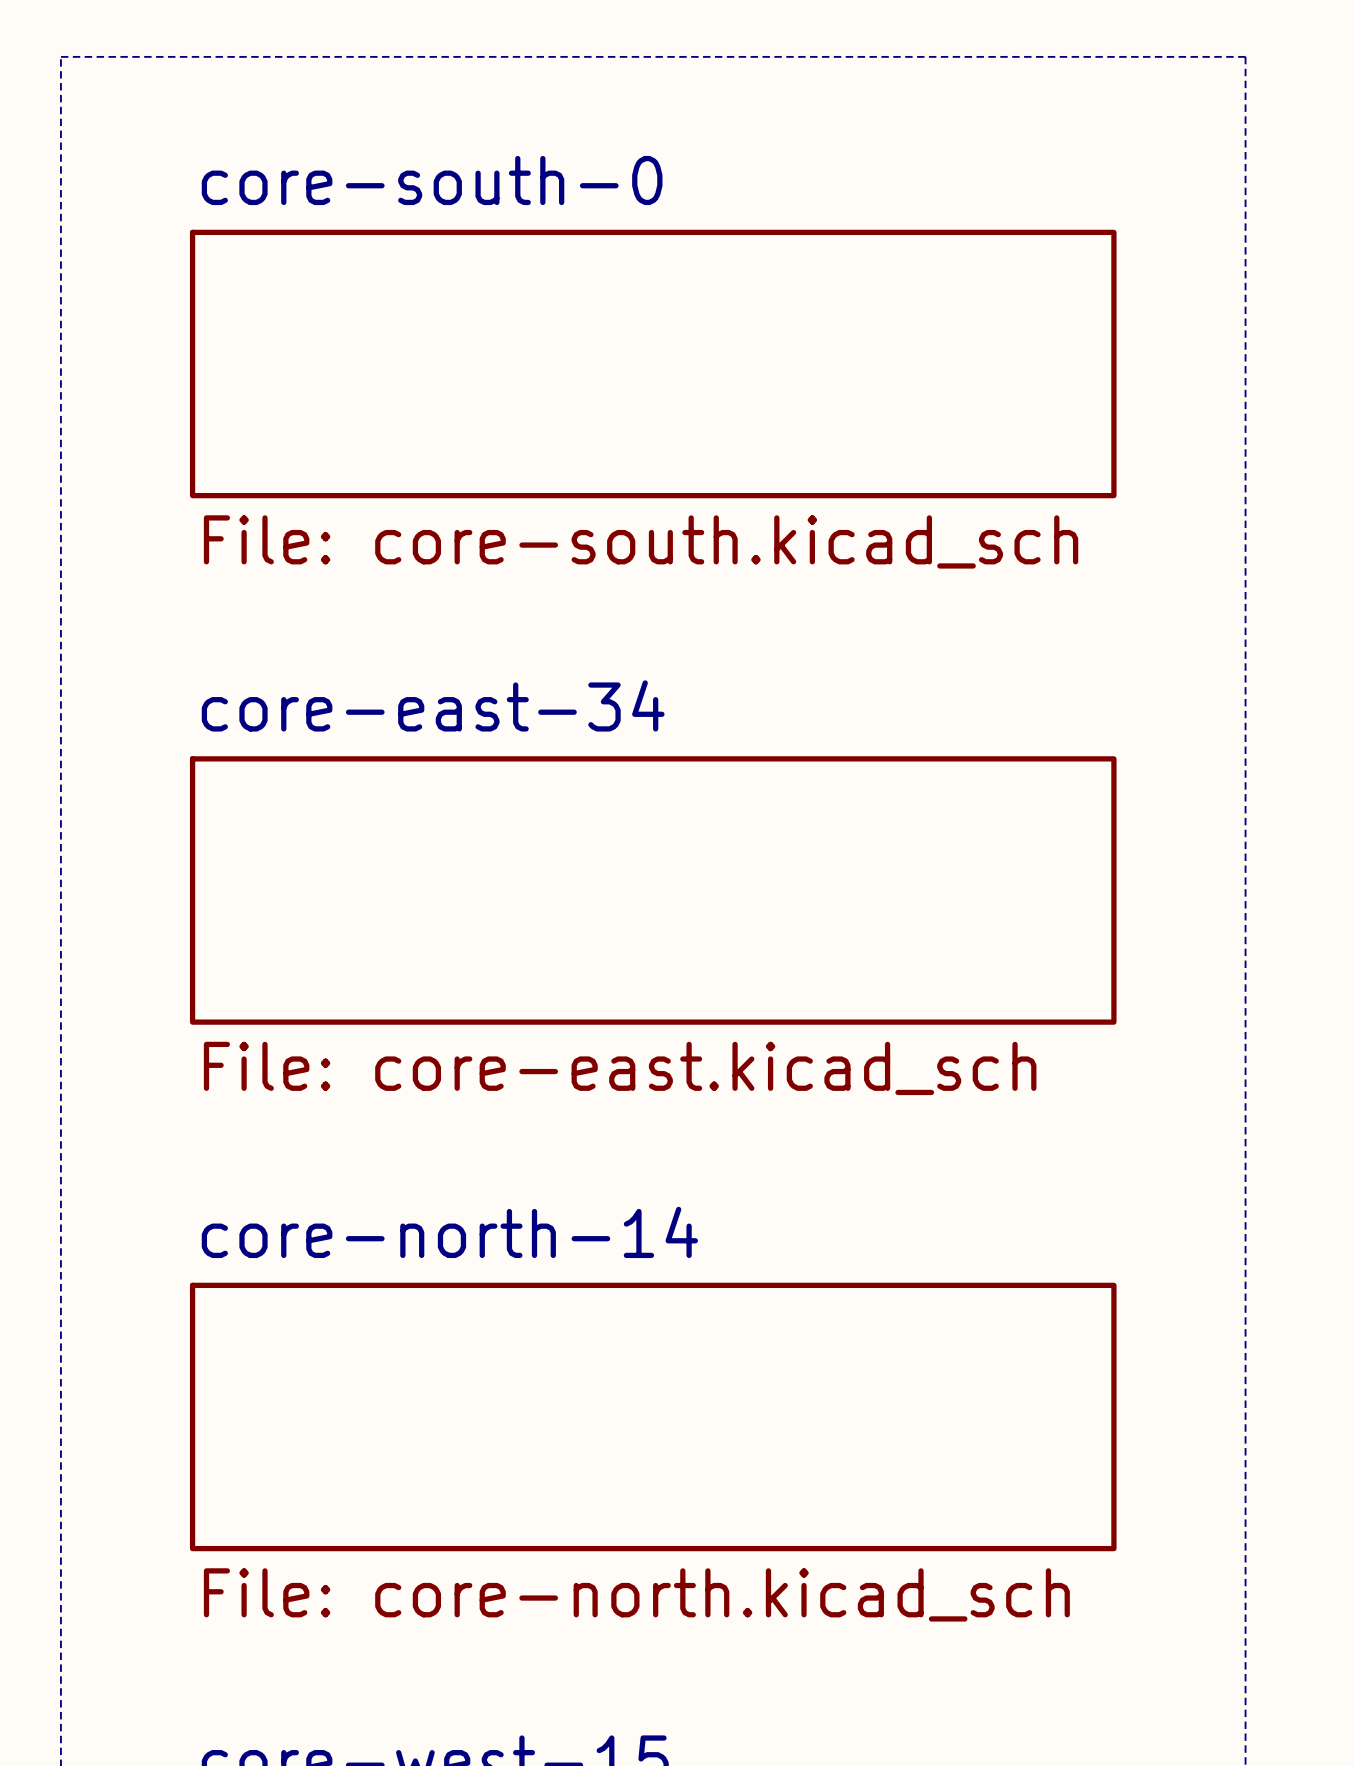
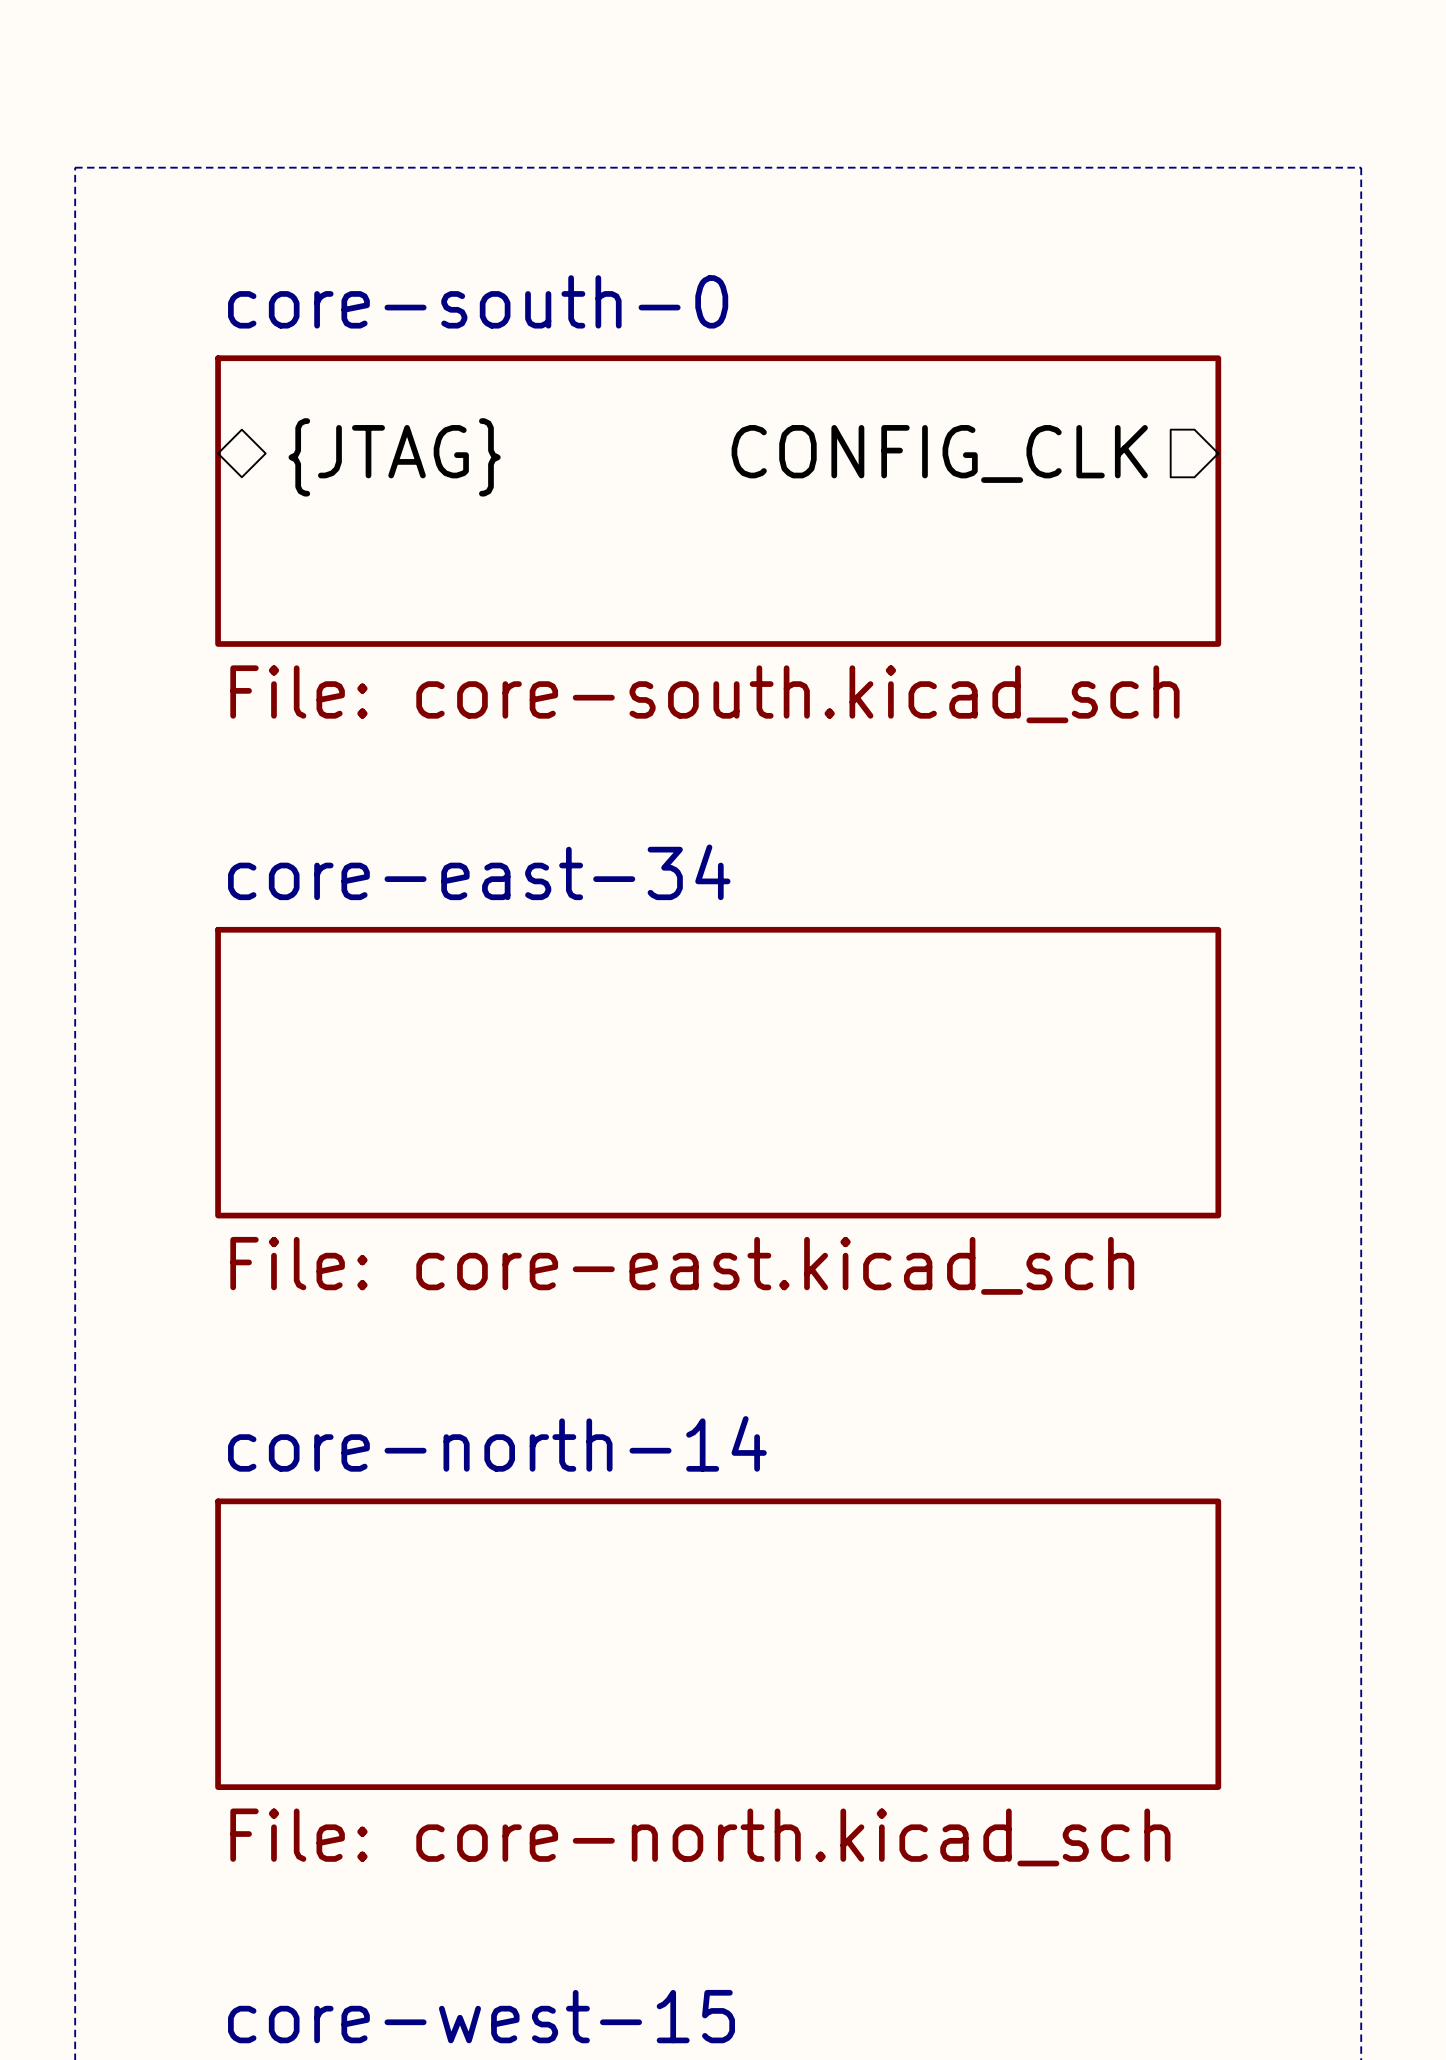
sheet pin: none -> CONFIG_CLK (939, 453)
sheet pin: none -> {JTAG} (394, 457)

